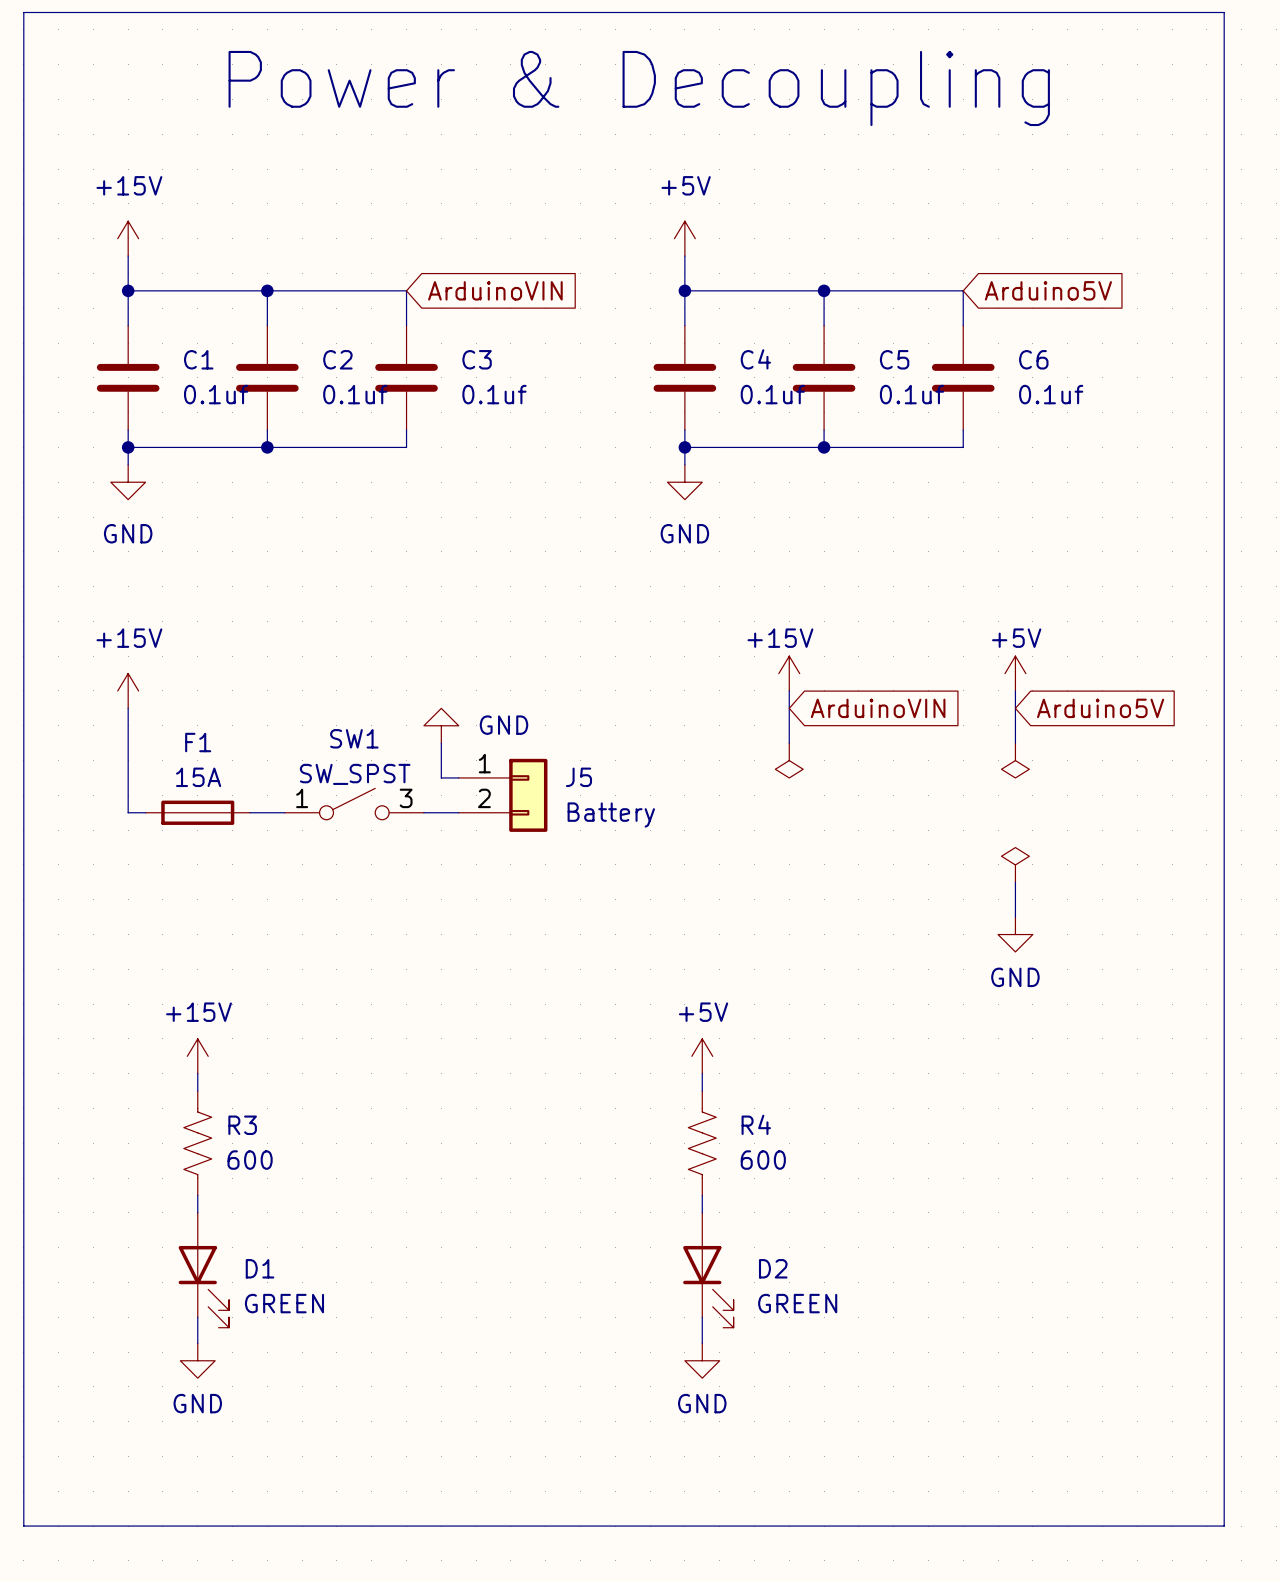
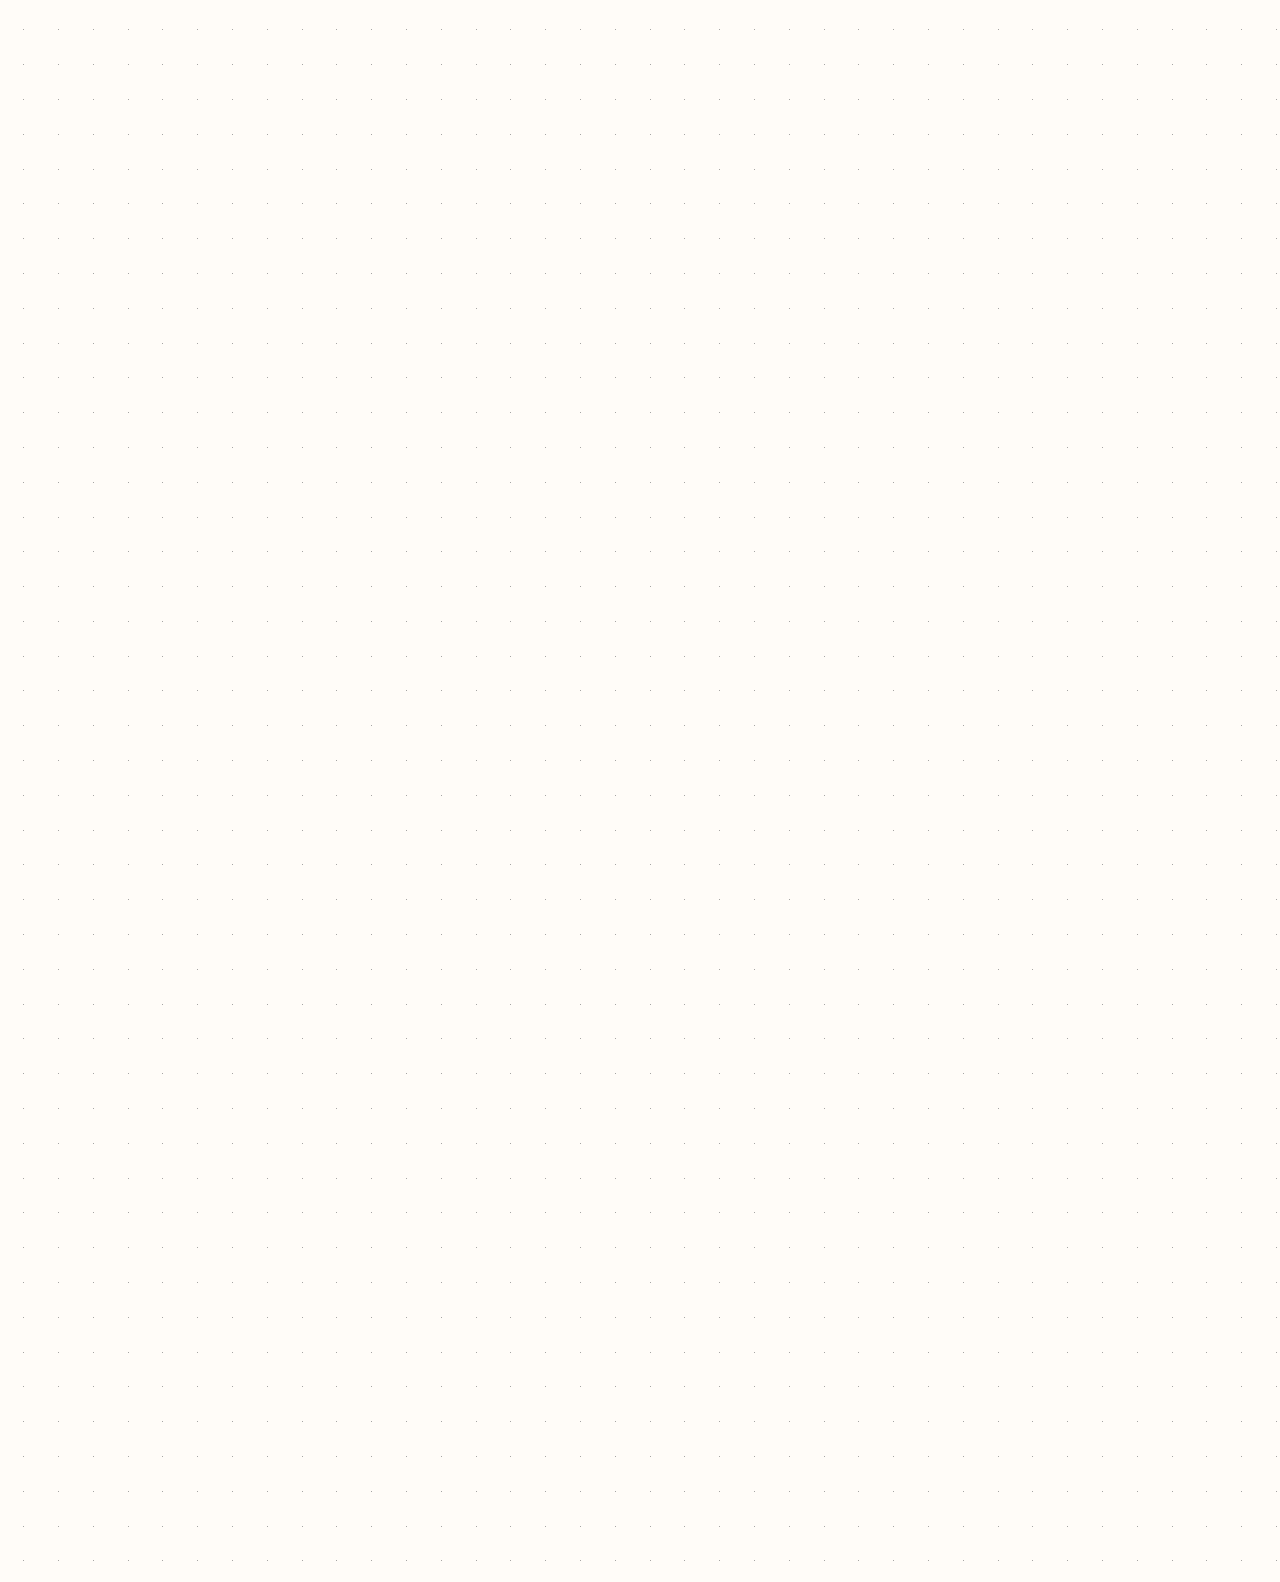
line: (23, 12) (1224, 12) (1224, 1526) (23, 1526) (23, 12) -> none
text: Power & Decoupling (639, 88) -> none
power symbol: +15V (128, 238) -> none
power symbol: +5V (684, 238) -> none
wire: (128, 256) (128, 325) -> none
wire: (684, 256) (684, 325) -> none
wire: (128, 290) (406, 290) (406, 325) -> none
junction: (128, 290) -> none
wire: (267, 290) (267, 325) -> none
junction: (267, 290) -> none
global label: ArduinoVIN (495, 290) -> none
wire: (684, 290) (963, 290) (963, 325) -> none
junction: (684, 290) -> none
wire: (824, 290) (824, 325) -> none
junction: (824, 290) -> none
global label: Arduino5V (1048, 290) -> none
C1: 0.1uf (128, 377) -> none
C2: 0.1uf (267, 377) -> none
C3: 0.1uf (406, 377) -> none
C4: 0.1uf (684, 377) -> none
C5: 0.1uf (824, 377) -> none
C6: 0.1uf (963, 377) -> none
wire: (128, 430) (128, 464) -> none
wire: (267, 430) (267, 447) -> none
wire: (406, 430) (406, 447) (128, 447) -> none
wire: (684, 430) (684, 464) -> none
wire: (824, 430) (824, 447) -> none
wire: (963, 430) (963, 447) (684, 447) -> none
junction: (128, 447) -> none
junction: (267, 447) -> none
junction: (684, 447) -> none
junction: (824, 447) -> none
power symbol: GND (128, 482) -> none
power symbol: GND (684, 482) -> none
power symbol: +15V (789, 673) -> none
power symbol: +5V (1015, 673) -> none
power symbol: +15V (128, 690) -> none
wire: (789, 690) (789, 743) -> none
wire: (1015, 690) (1015, 743) -> none
wire: (128, 708) (128, 812) (145, 812) -> none
global label: ArduinoVIN (878, 708) -> none
global label: Arduino5V (1100, 708) -> none
power symbol: GND (441, 725) -> none
wire: (441, 743) (441, 777) (458, 777) -> none
power symbol: (789, 760) -> none
power symbol: (1015, 760) -> none
J5: Battery (503, 795) -> none
SW1: SW_SPST (354, 804) -> none
F1: 15A (197, 812) -> none
wire: (249, 812) (284, 812) -> none
wire: (423, 812) (458, 812) -> none
power symbol: (1015, 864) -> none
wire: (1015, 882) (1015, 917) -> none
power symbol: GND (1015, 934) -> none
power symbol: +15V (197, 1056) -> none
power symbol: +5V (702, 1056) -> none
wire: (197, 1073) (197, 1091) -> none
wire: (702, 1073) (702, 1091) -> none
R3: 600 (197, 1143) -> none
R4: 600 (702, 1143) -> none
wire: (197, 1195) (197, 1212) -> none
wire: (702, 1195) (702, 1212) -> none
D1: GREEN (203, 1270) -> none
D2: GREEN (708, 1270) -> none
wire: (197, 1317) (197, 1343) -> none
wire: (702, 1317) (702, 1343) -> none
power symbol: GND (197, 1360) -> none
power symbol: GND (702, 1360) -> none

